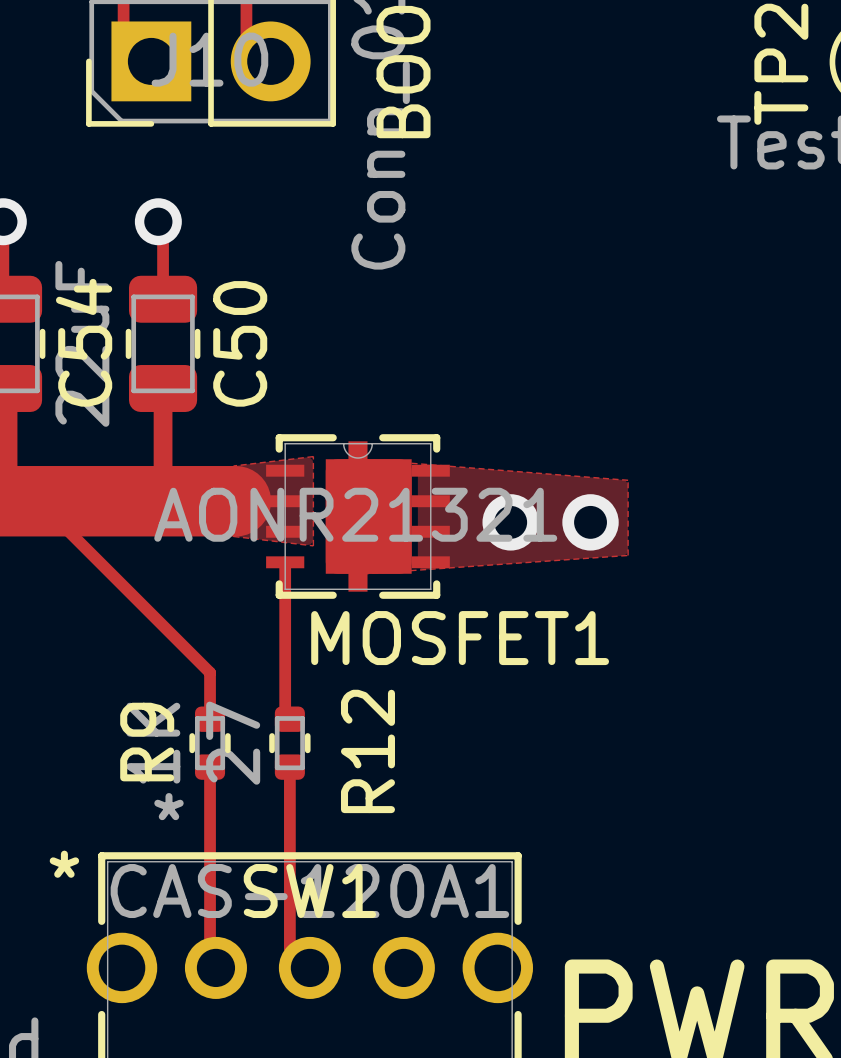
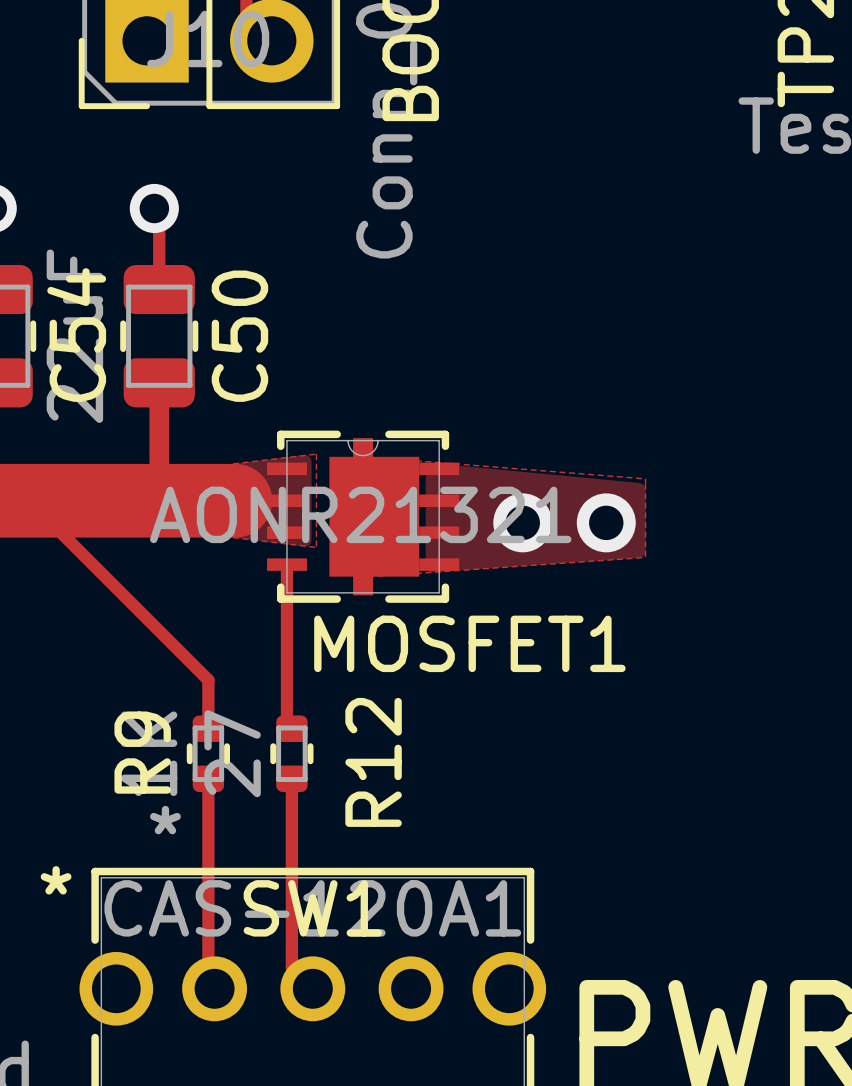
MOSFET1 footprint: [266, 434, 450, 599] -> [267, 430, 460, 603]

